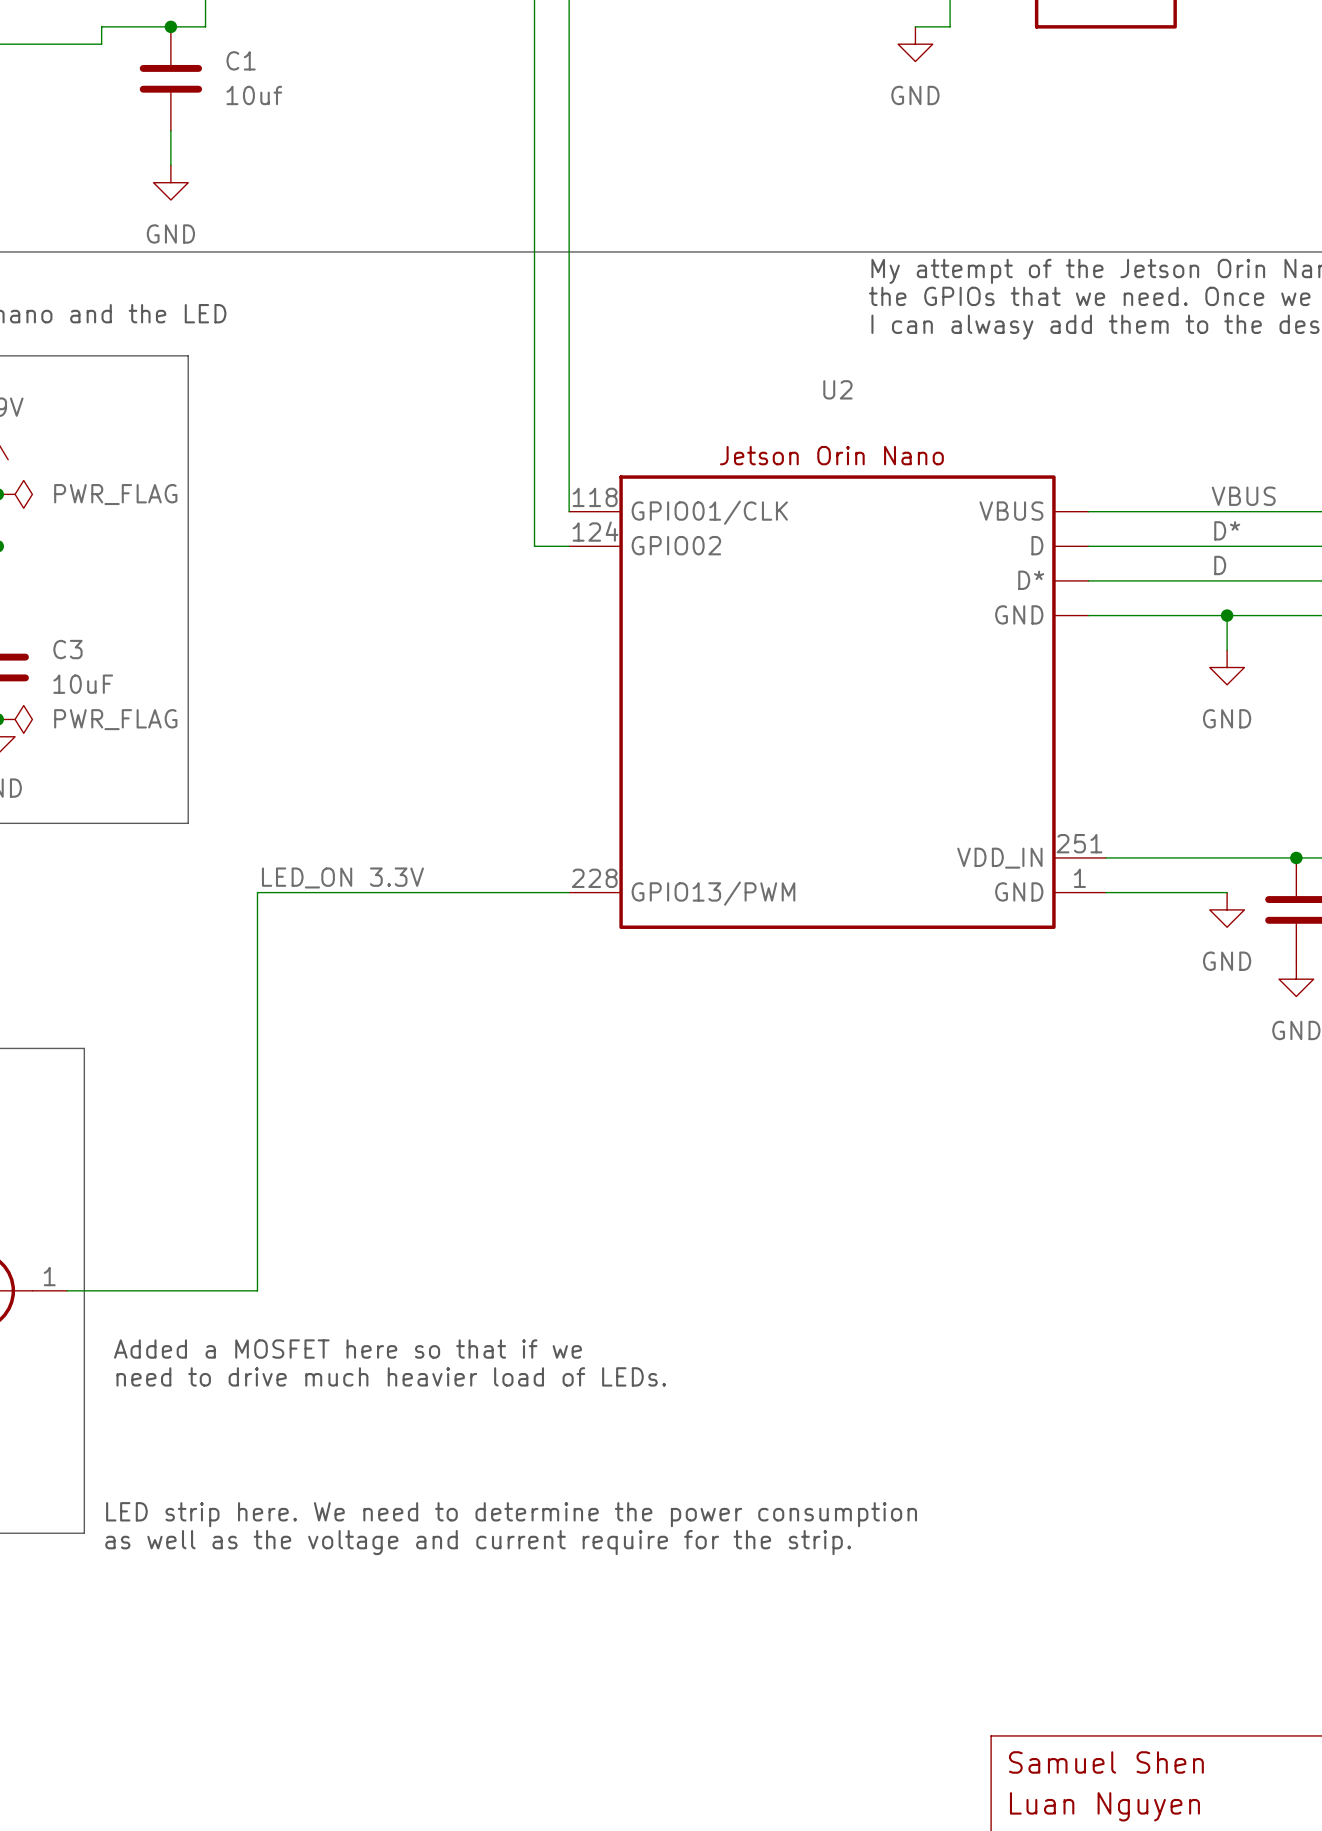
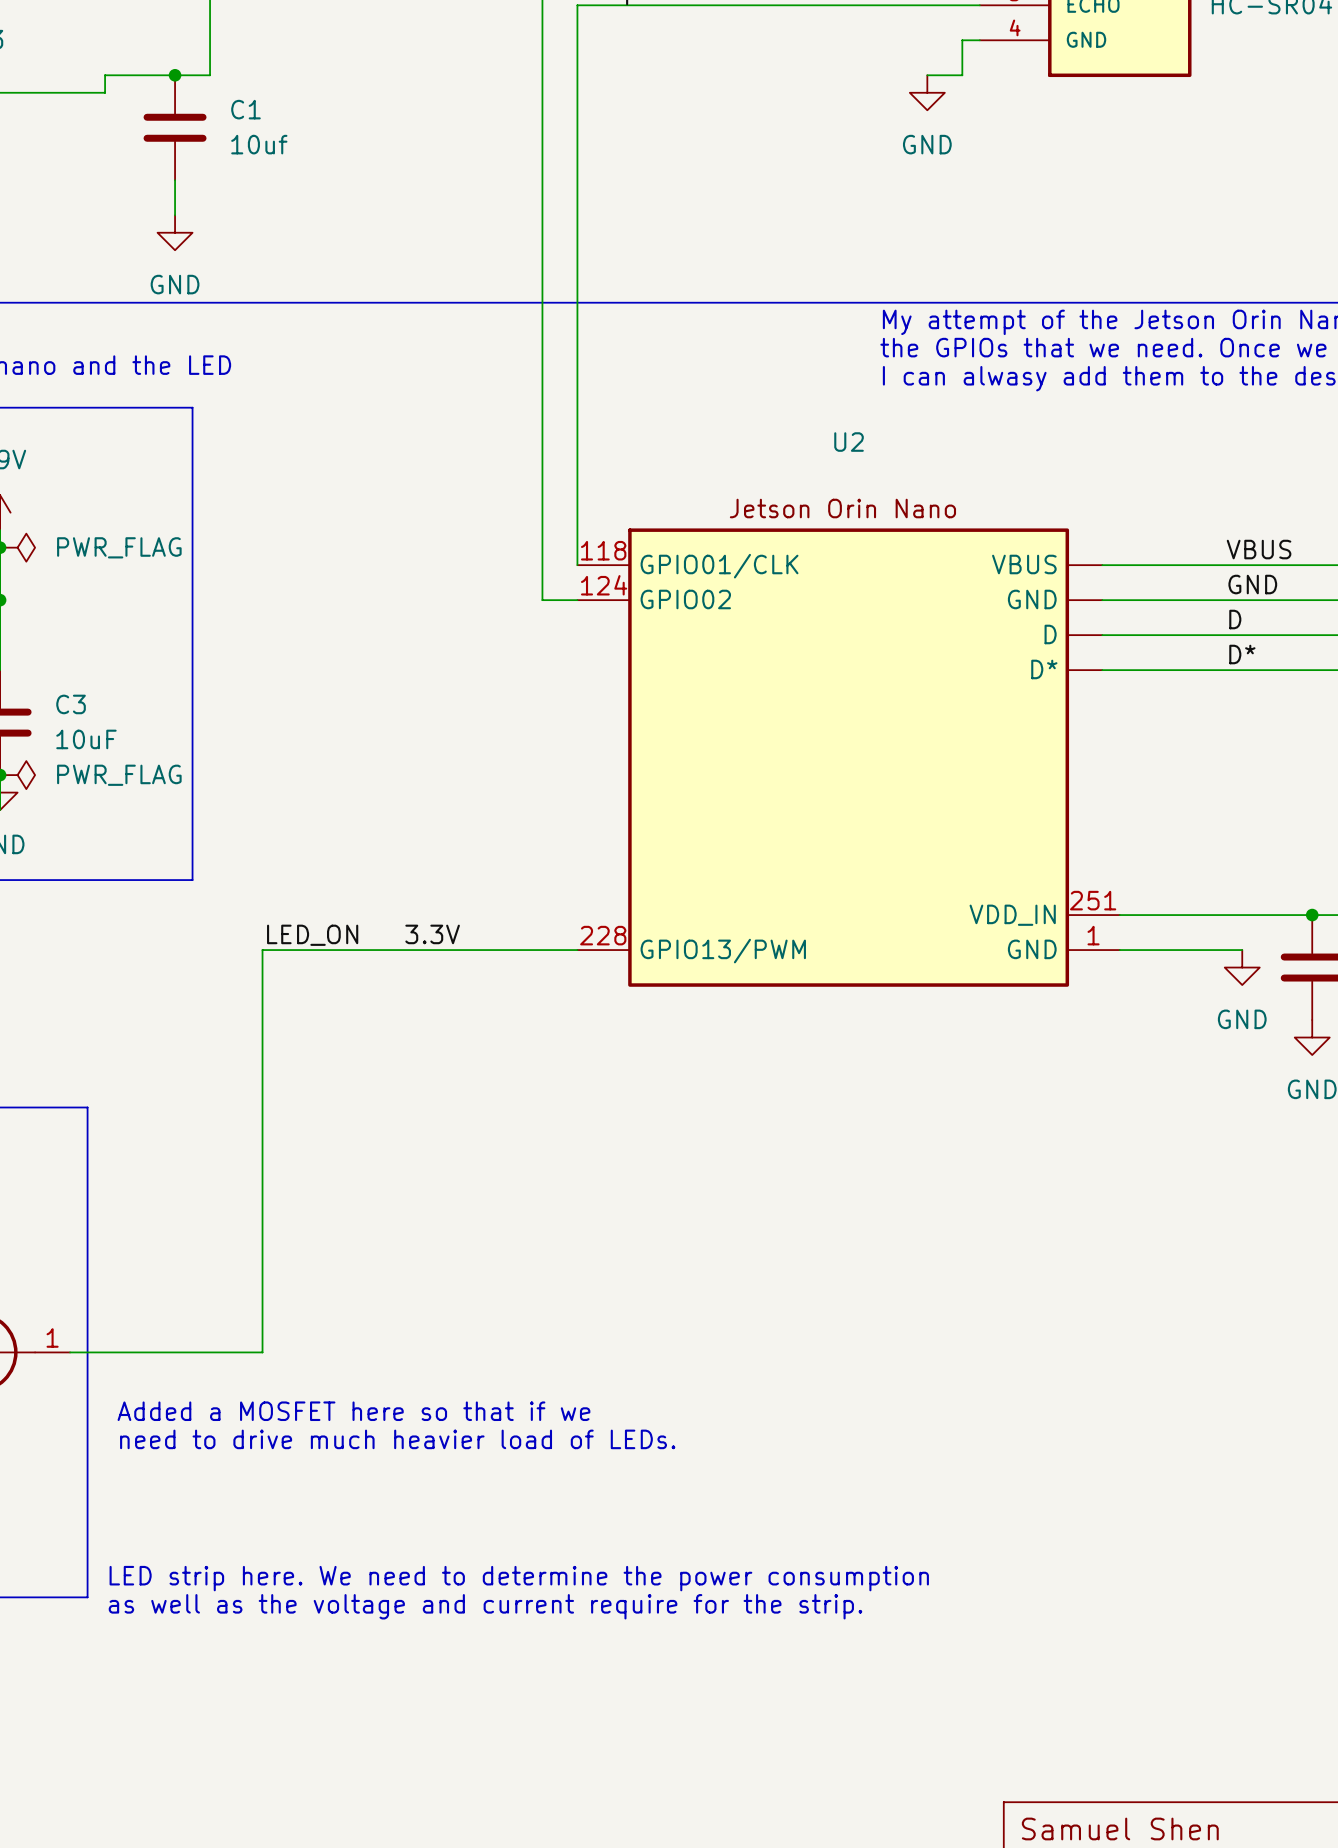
label: D* (1227, 530) -> GND (1252, 584)
U2 pin name: D (1037, 545) -> GND (1032, 599)
U2 pin name: D* (1031, 580) -> D (1050, 634)
label: none -> D* (1242, 654)
U2 pin name: GND (1019, 614) -> D* (1044, 669)
wire: (1227, 615) (1227, 650) -> none
junction: (1227, 615) -> none
power symbol: GND (1227, 667) -> none
label: LED_ON 3.3V (342, 877) -> LED_ON (312, 935)
label: none -> 3.3V (432, 934)

